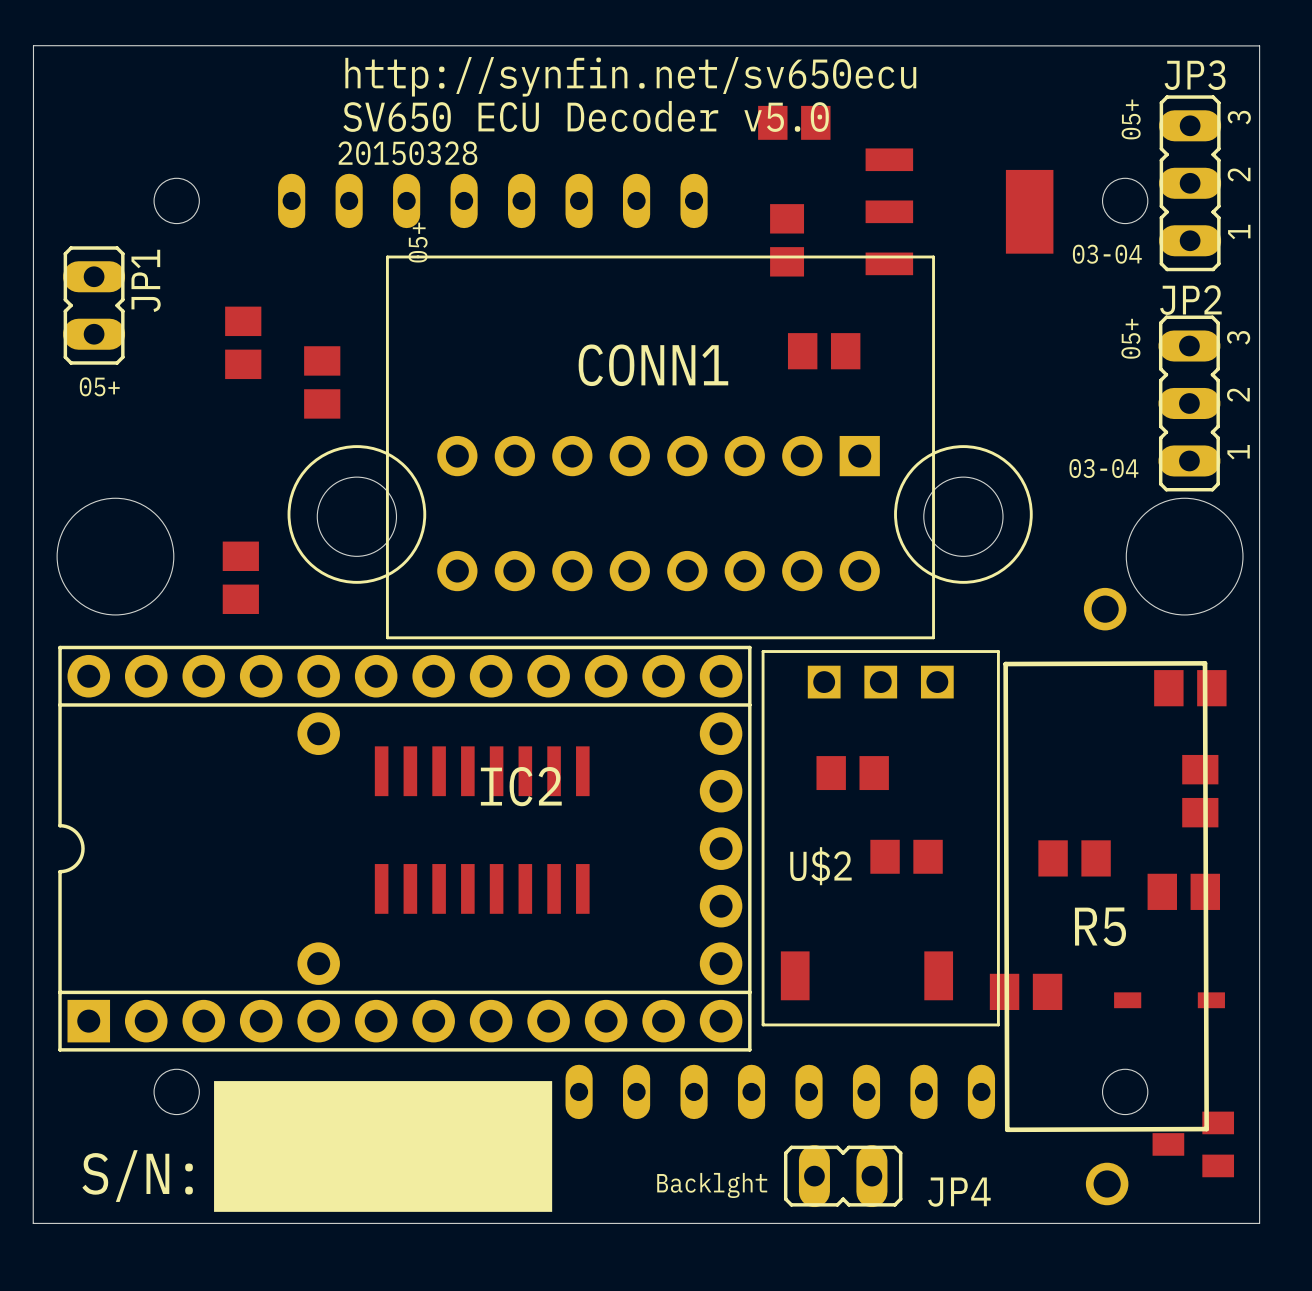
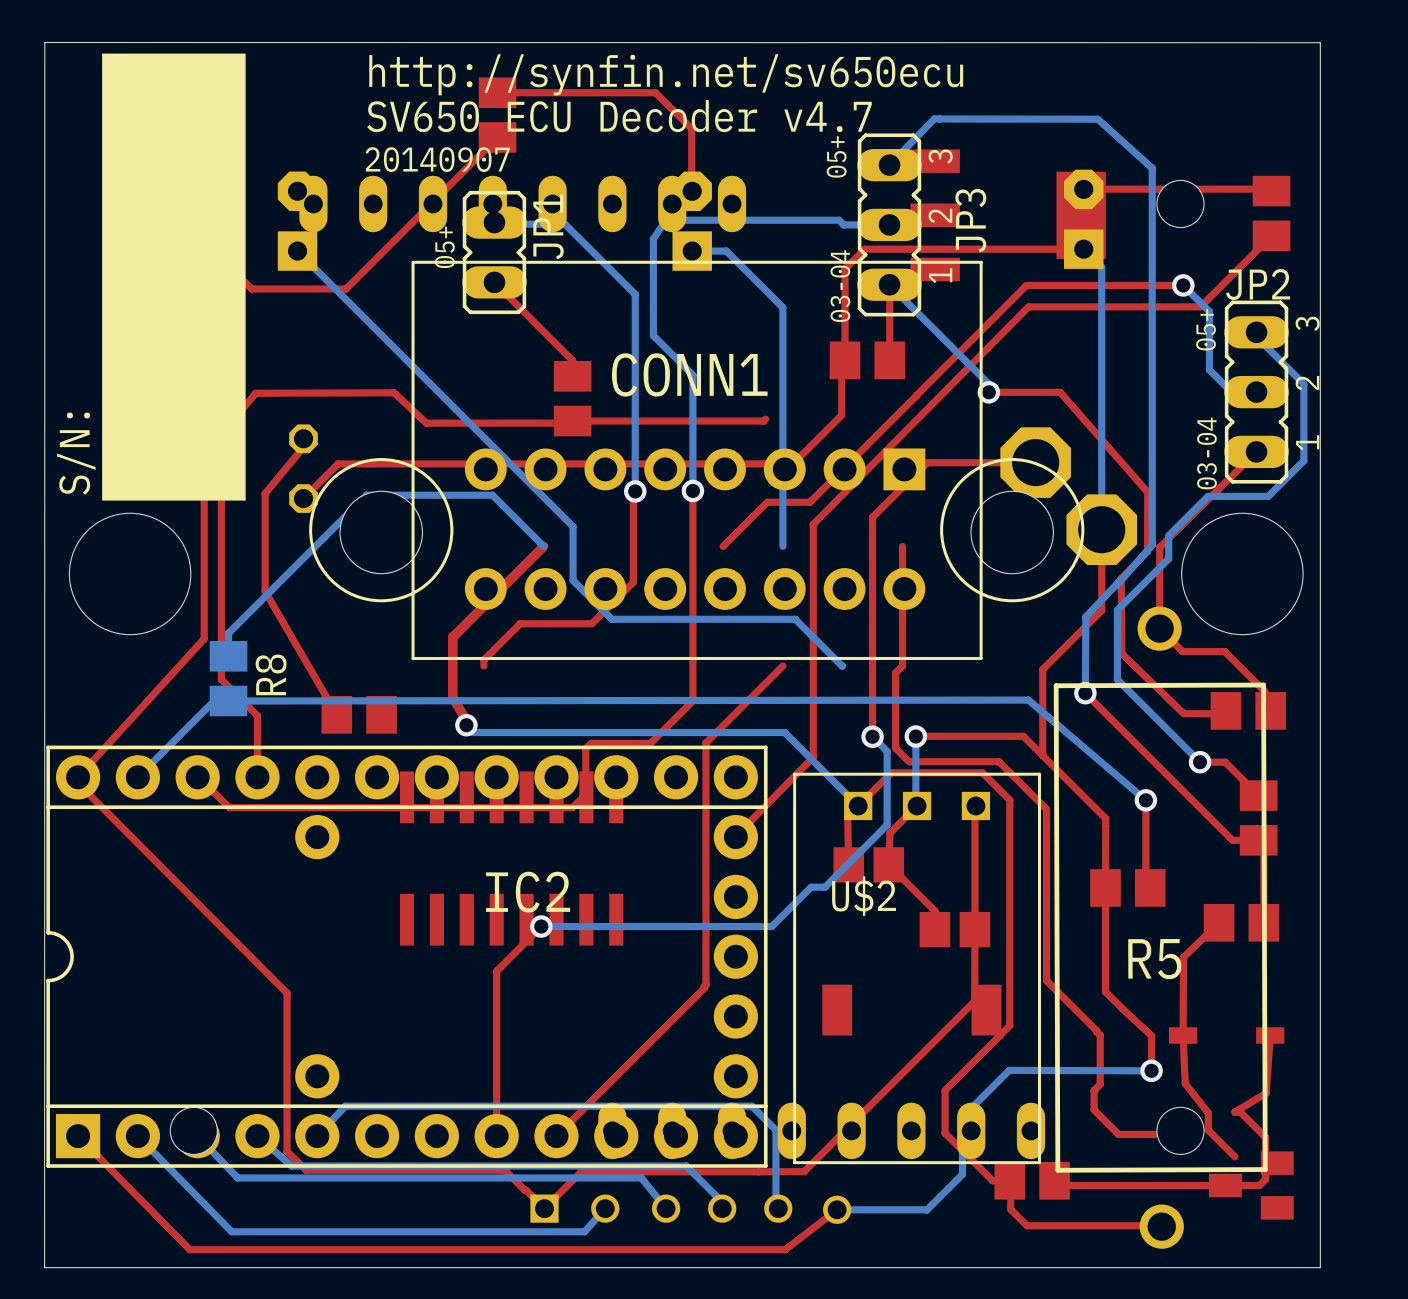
drawing: none -> [102, 53, 246, 501]
JP3 name rotation: 0° (1195, 75) -> 90° counterclockwise (970, 220)
JP3 name position: JP3 (1195, 75) -> JP3 (970, 220)
top track: none -> (497, 92) (655, 92) (691, 128) (692, 191)
part: none -> (497, 115)
text: SV650 ECU Decoder v5.0 (586, 116) -> SV650 ECU Decoder v4.7 (619, 116)
text: 05+ (1131, 119) -> none
part: (794, 122) -> none
top track: none -> (497, 137) (346, 288) (251, 288) (199, 236) (118, 236) (204, 322) (204, 638) (78, 777) (78, 783) (287, 993) (287, 1151) (306, 1170) (504, 1170) (544, 1208) (581, 1171) (804, 1171) (974, 1001) (975, 805)
text: 20150328 (407, 153) -> 20140907 (437, 159)
text: none -> 05+ (836, 156)
bottom track: none -> (889, 165) (934, 118) (1097, 119) (1152, 168) (1152, 545) (1085, 616) (1085, 693)
JP3 position: (1190, 183) -> (889, 224)
top track: none -> (1083, 189) (1265, 189) (1271, 191)
part: none -> (1271, 213)
part: none -> (1083, 219)
part: none -> (297, 221)
part: none -> (692, 221)
bottom track: none -> (494, 222) (496, 224) (565, 224) (635, 294) (635, 491)
bottom track: none -> (889, 224) (843, 224) (839, 220) (665, 220) (653, 239) (653, 335) (692, 375) (692, 490)
top track: none -> (1271, 235) (1200, 306) (1028, 306) (813, 524) (813, 757) (735, 837)
part: (787, 240) -> none
top track: none -> (1083, 249) (864, 249) (845, 268) (845, 360) (841, 362) (841, 415) (792, 463) (338, 463) (303, 498)
bottom track: none -> (1083, 249) (1101, 267) (1101, 529) (1099, 527)
bottom track: none -> (297, 251) (573, 526) (573, 580) (611, 619) (795, 619) (842, 665)
bottom track: none -> (692, 251) (726, 251) (782, 307) (782, 546)
text: 03-04 (1107, 254) -> none
top track: none -> (494, 282) (572, 360) (572, 376)
top track: none -> (889, 284) (889, 360)
bottom track: none -> (889, 284) (988, 384) (988, 392)
text: none -> 03-04 (840, 286)
top track: none -> (1183, 285) (1026, 285) (916, 395)
bottom track: none -> (1183, 285) (1209, 311) (1209, 369) (1231, 391) (1256, 392)
via: none -> (1183, 285)
JP1 position: (94, 305) -> (494, 252)
bottom track: none -> (1255, 335) (1303, 384) (1303, 460) (1268, 496) (1208, 496) (1168, 535) (1168, 558) (1117, 610) (1117, 679) (1200, 762)
text position: 05+ (1130, 338) -> 05+ (1206, 329)
part: (243, 342) -> none
top track: none -> (988, 392) (1060, 392) (1147, 492) (1147, 551) (1121, 578) (1121, 653) (1183, 713) (1216, 713) (1225, 710)
via: none -> (988, 392)
part: (322, 382) -> none
top track: none -> (916, 395) (809, 502) (767, 502) (723, 546)
text: 05+ (99, 386) -> none
part: none -> (572, 398)
JP2 position: (1189, 403) -> (1256, 392)
top track: none -> (765, 419) (763, 421) (426, 423) (394, 392) (255, 393) (221, 434) (221, 679) (257, 715) (257, 777)
top track: none -> (303, 438) (303, 447) (265, 493) (265, 591) (336, 714)
top track: none -> (1256, 451) (1159, 547) (1159, 628) (1182, 651) (1224, 651) (1264, 691) (1270, 710)
text: none -> S/N: (76, 453)
top track: none -> (1035, 462) (927, 462) (872, 517) (872, 736)
part: none -> (303, 468)
text rotation: 0° (1103, 468) -> 90° counterclockwise (1206, 453)
top track: none -> (692, 490) (692, 700) (650, 743) (591, 743) (585, 748) (585, 794) (572, 807) (229, 807) (197, 777)
via: none -> (692, 490)
top track: none -> (635, 491) (633, 493) (633, 582) (591, 623) (520, 623) (483, 659) (483, 665)
via: none -> (635, 491)
part: none -> (1068, 496)
top track: none -> (1101, 529) (1101, 610) (1042, 669) (1042, 755)
top track: none -> (543, 546) (454, 635)
bottom track: none -> (543, 546) (492, 495) (366, 495) (228, 633) (228, 656)
top track: none -> (902, 546) (902, 665) (895, 672) (895, 748) (909, 761) (998, 761) (1046, 809) (1046, 980) (1100, 1035) (1100, 1084) (1094, 1090) (1094, 1109) (1118, 1134) (1183, 1134)
R8 side: top (240, 577) -> bottom (228, 678)
top track: none -> (452, 636) (452, 697) (466, 720) (466, 725)
top track: none -> (782, 665) (705, 742) (705, 984) (556, 1136)
top track: none -> (1085, 693) (1232, 840) (1258, 840) (1263, 845) (1263, 922)
via: none -> (1085, 693)
part: none -> (359, 714)
bottom track: none -> (466, 725) (473, 732) (784, 732) (858, 805)
via: none -> (466, 725)
bottom track: none -> (915, 736) (917, 805)
via: none -> (915, 736)
top track: none -> (916, 736) (1023, 736) (1105, 818) (1105, 991) (1151, 1035) (1151, 1070)
bottom track: none -> (872, 736) (887, 751) (887, 825) (825, 887) (811, 887) (771, 926) (541, 926)
via: none -> (872, 736)
top track: none -> (1200, 762) (1225, 762) (1258, 795)
via: none -> (1200, 762)
bottom track: none -> (137, 777) (215, 700) (1028, 700) (1145, 800)
part: (852, 773) -> none
top track: none -> (1145, 800) (1145, 883) (1150, 887)
via: none -> (1145, 800)
top track: none -> (917, 805) (889, 833) (888, 864) (934, 910) (934, 929)
top track: none -> (848, 864) (847, 816) (891, 772) (982, 772) (1009, 800) (1009, 1025) (1000, 1035)
part: none -> (868, 864)
part: (880, 838) -> none
part position: (404, 848) -> (406, 956)
part: (906, 856) -> none
top track: none -> (1219, 922) (1183, 957) (1185, 1083) (1208, 1112) (1208, 1130) (1234, 1156)
top track: none -> (541, 926) (496, 971) (496, 1136)
via: none -> (541, 926)
part: none -> (954, 929)
part: none -> (917, 968)
part position: (1026, 991) -> (1032, 1180)
top track: none -> (1000, 1035) (945, 1090) (945, 1133) (992, 1180) (1010, 1181) (1010, 1209) (1027, 1225) (1161, 1226)
top track: none -> (1270, 1035) (1266, 1093) (1234, 1112) (1240, 1112) (1265, 1137) (1265, 1179) (1259, 1185) (1069, 1185) (1054, 1180)
bottom track: none -> (1151, 1070) (1009, 1070) (962, 1117) (962, 1174) (926, 1210) (837, 1209)
via: none -> (1151, 1070)
drawing: [214, 1081, 553, 1212] -> none
top track: none -> (78, 1136) (189, 1249) (785, 1249) (837, 1209)
bottom track: none -> (137, 1136) (231, 1231) (584, 1231) (605, 1208)
bottom track: none -> (197, 1136) (237, 1177) (641, 1177) (666, 1208)
bottom track: none -> (257, 1136) (291, 1166) (686, 1166) (722, 1201) (722, 1208)
bottom track: none -> (317, 1136) (345, 1106) (752, 1106) (775, 1130) (775, 1200) (778, 1208)
part: none -> (690, 1209)
text: S/N: (137, 1176) -> none
JP4: (843, 1176) -> none
text: Backlght (712, 1185) -> none

